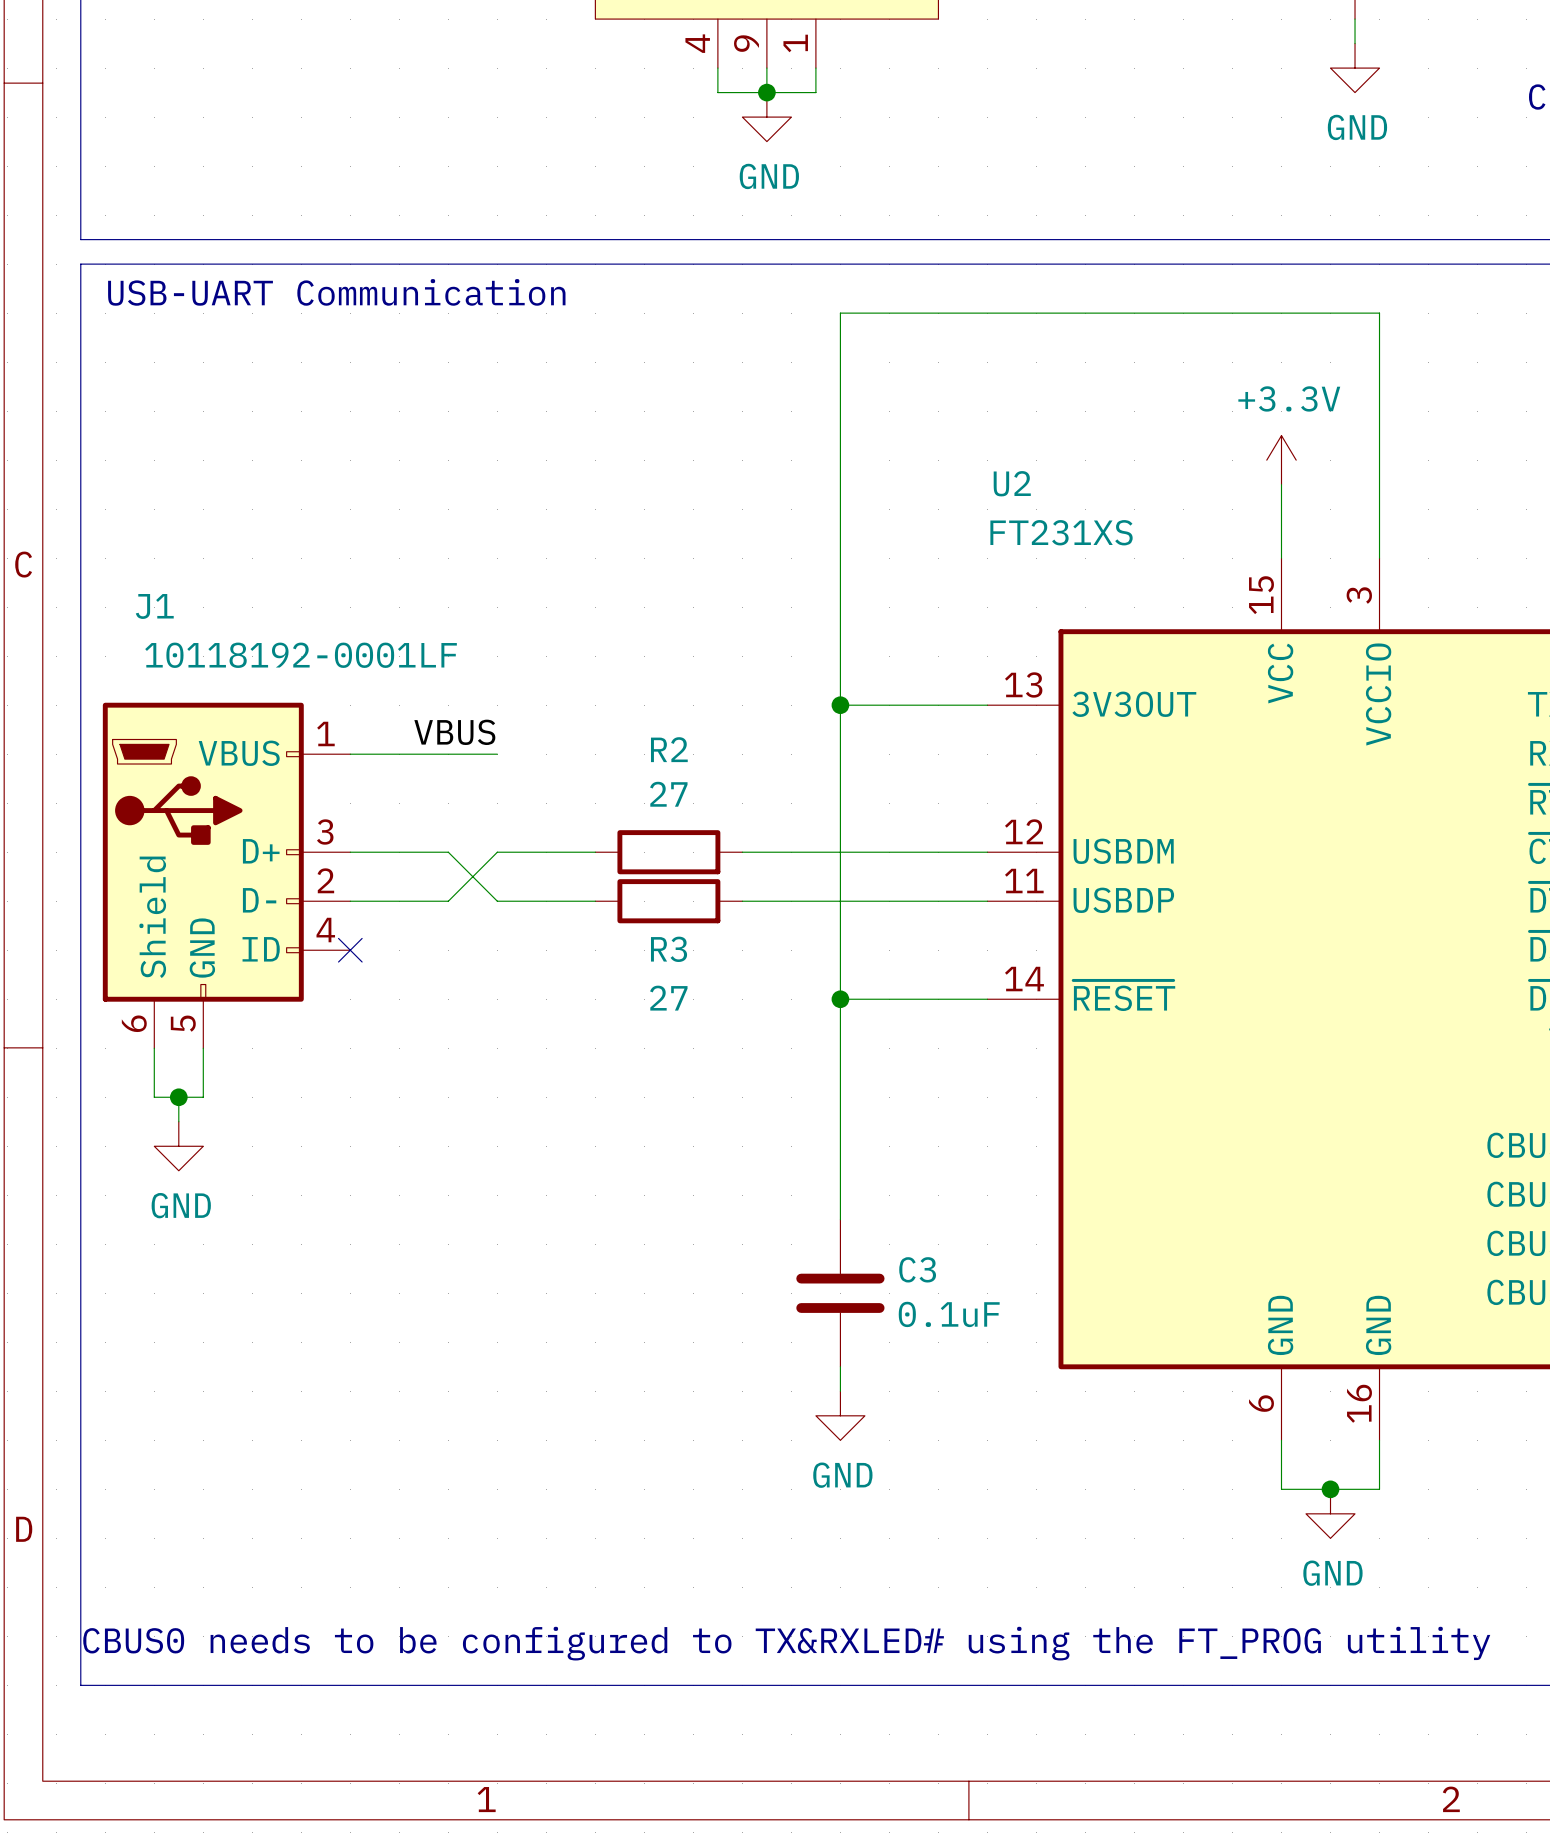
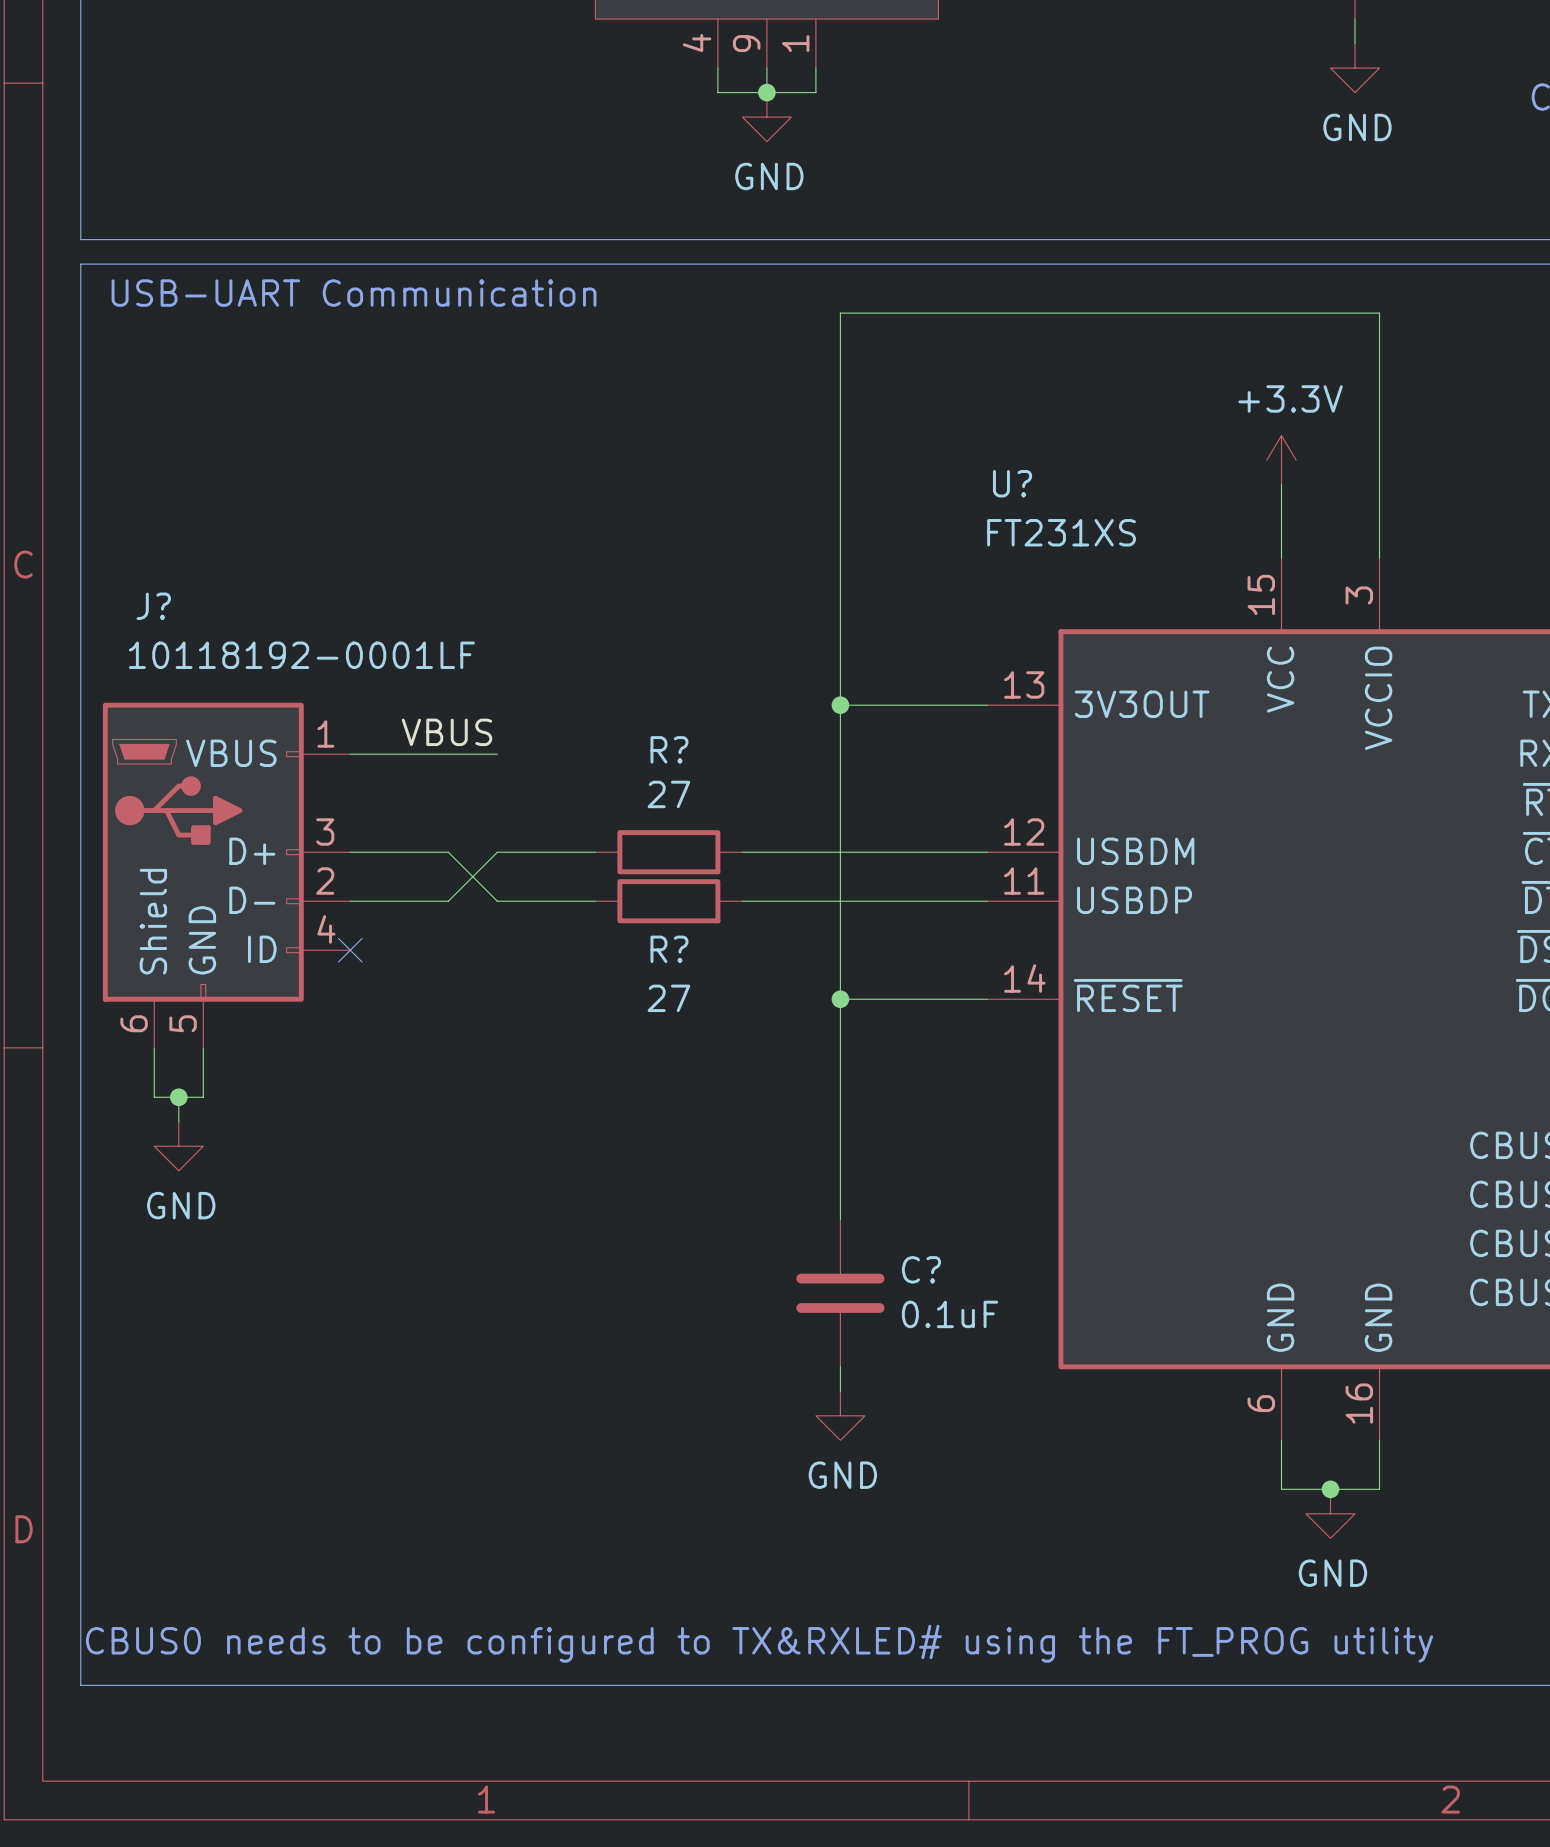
U2 name: U2 (1012, 483) -> U? (1012, 483)
J1 name: J1 (154, 606) -> J? (153, 606)
R2 name: R2 (669, 749) -> R? (669, 749)
R3 name: R3 (669, 949) -> R? (669, 949)
C3 name: C3 (917, 1269) -> C? (921, 1269)

